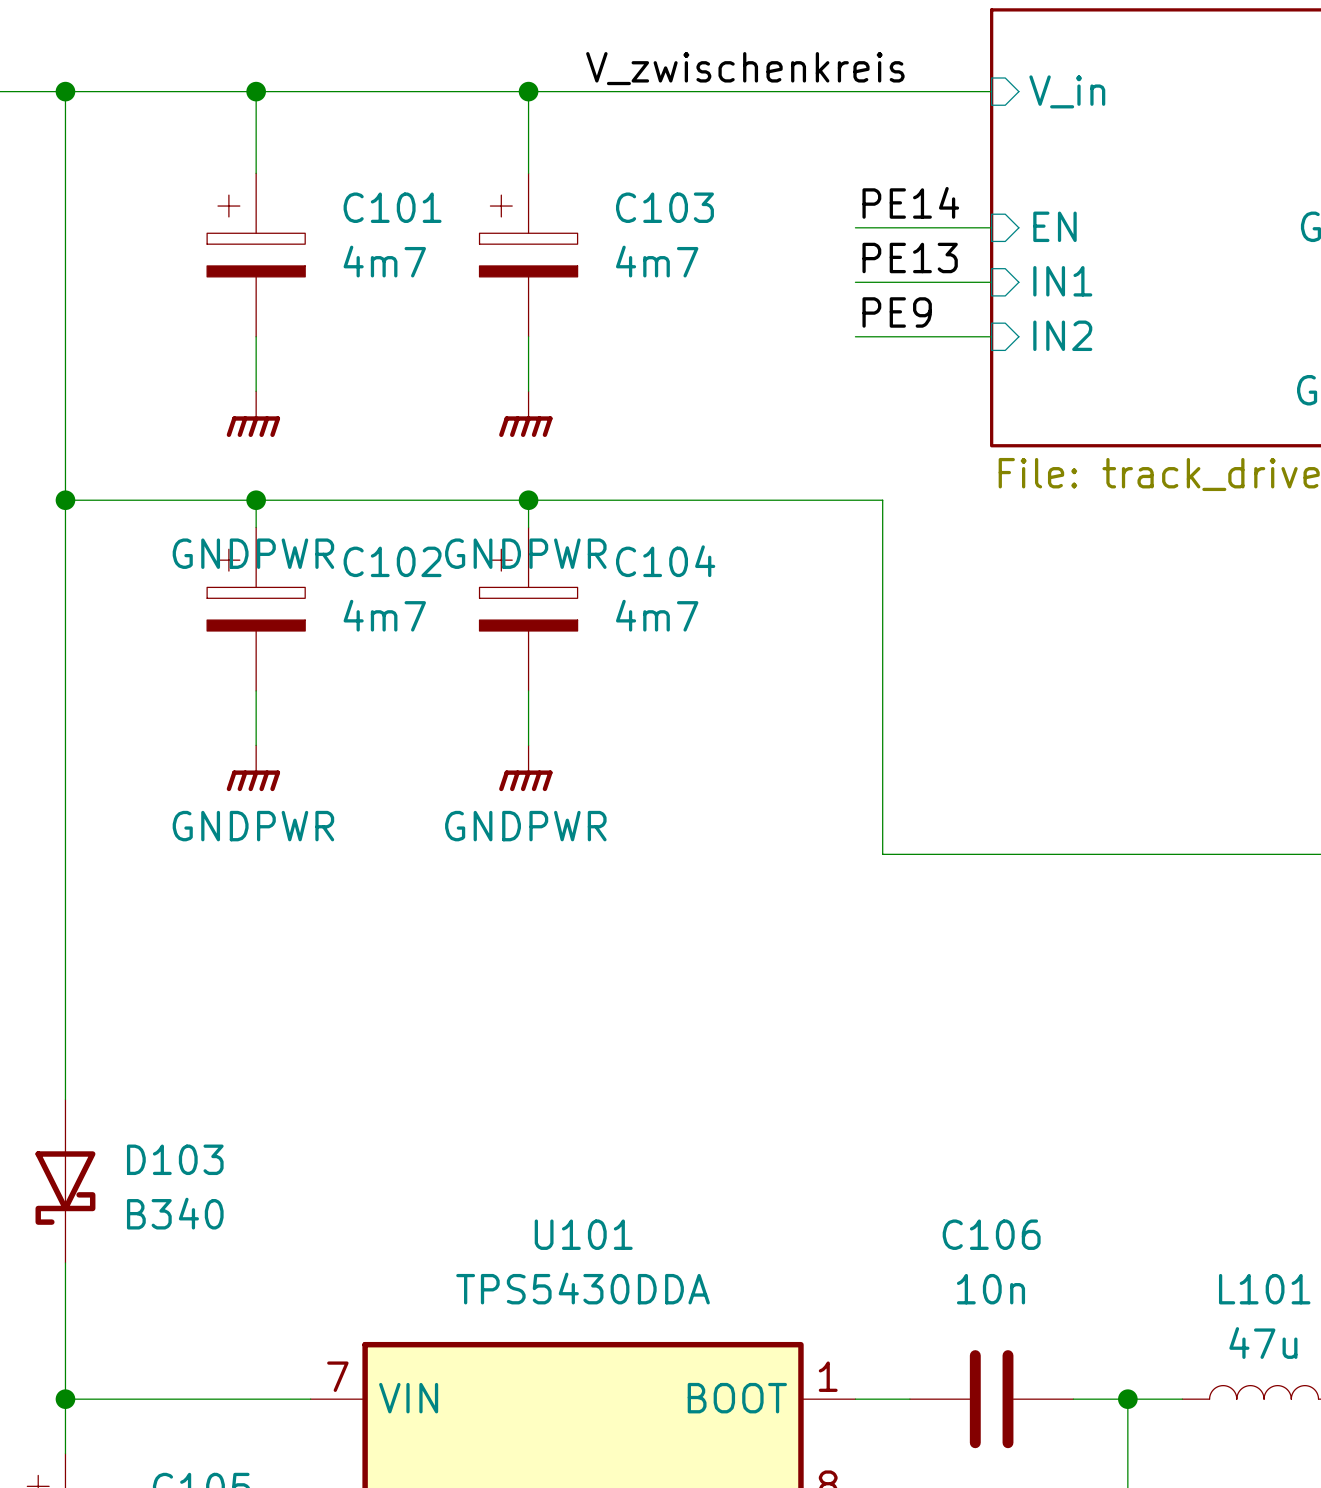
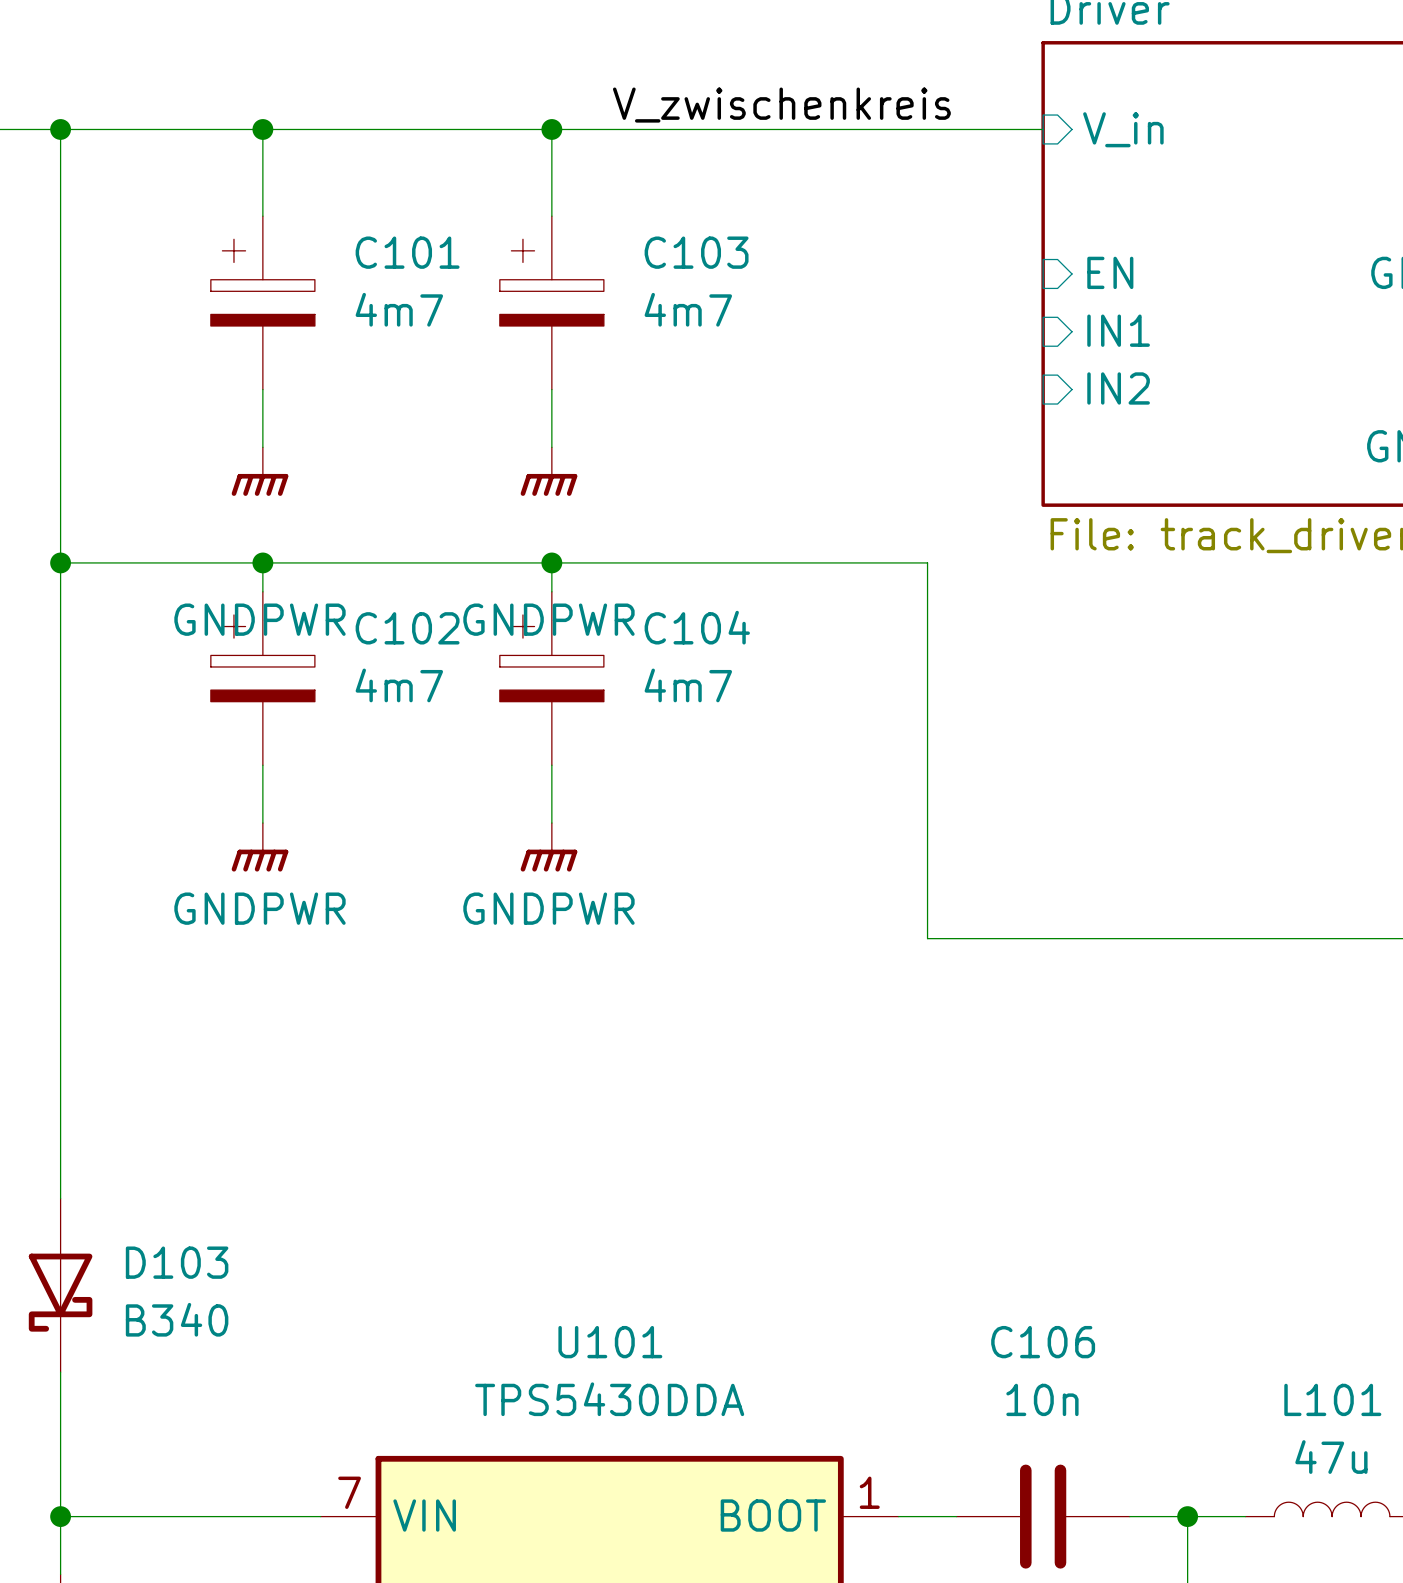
label: PE14 (910, 202) -> none
wire: (855, 227) (991, 227) -> none
label: PE13 (910, 257) -> none
wire: (855, 282) (991, 282) -> none
label: PE9 (897, 312) -> none
wire: (855, 336) (991, 336) -> none

